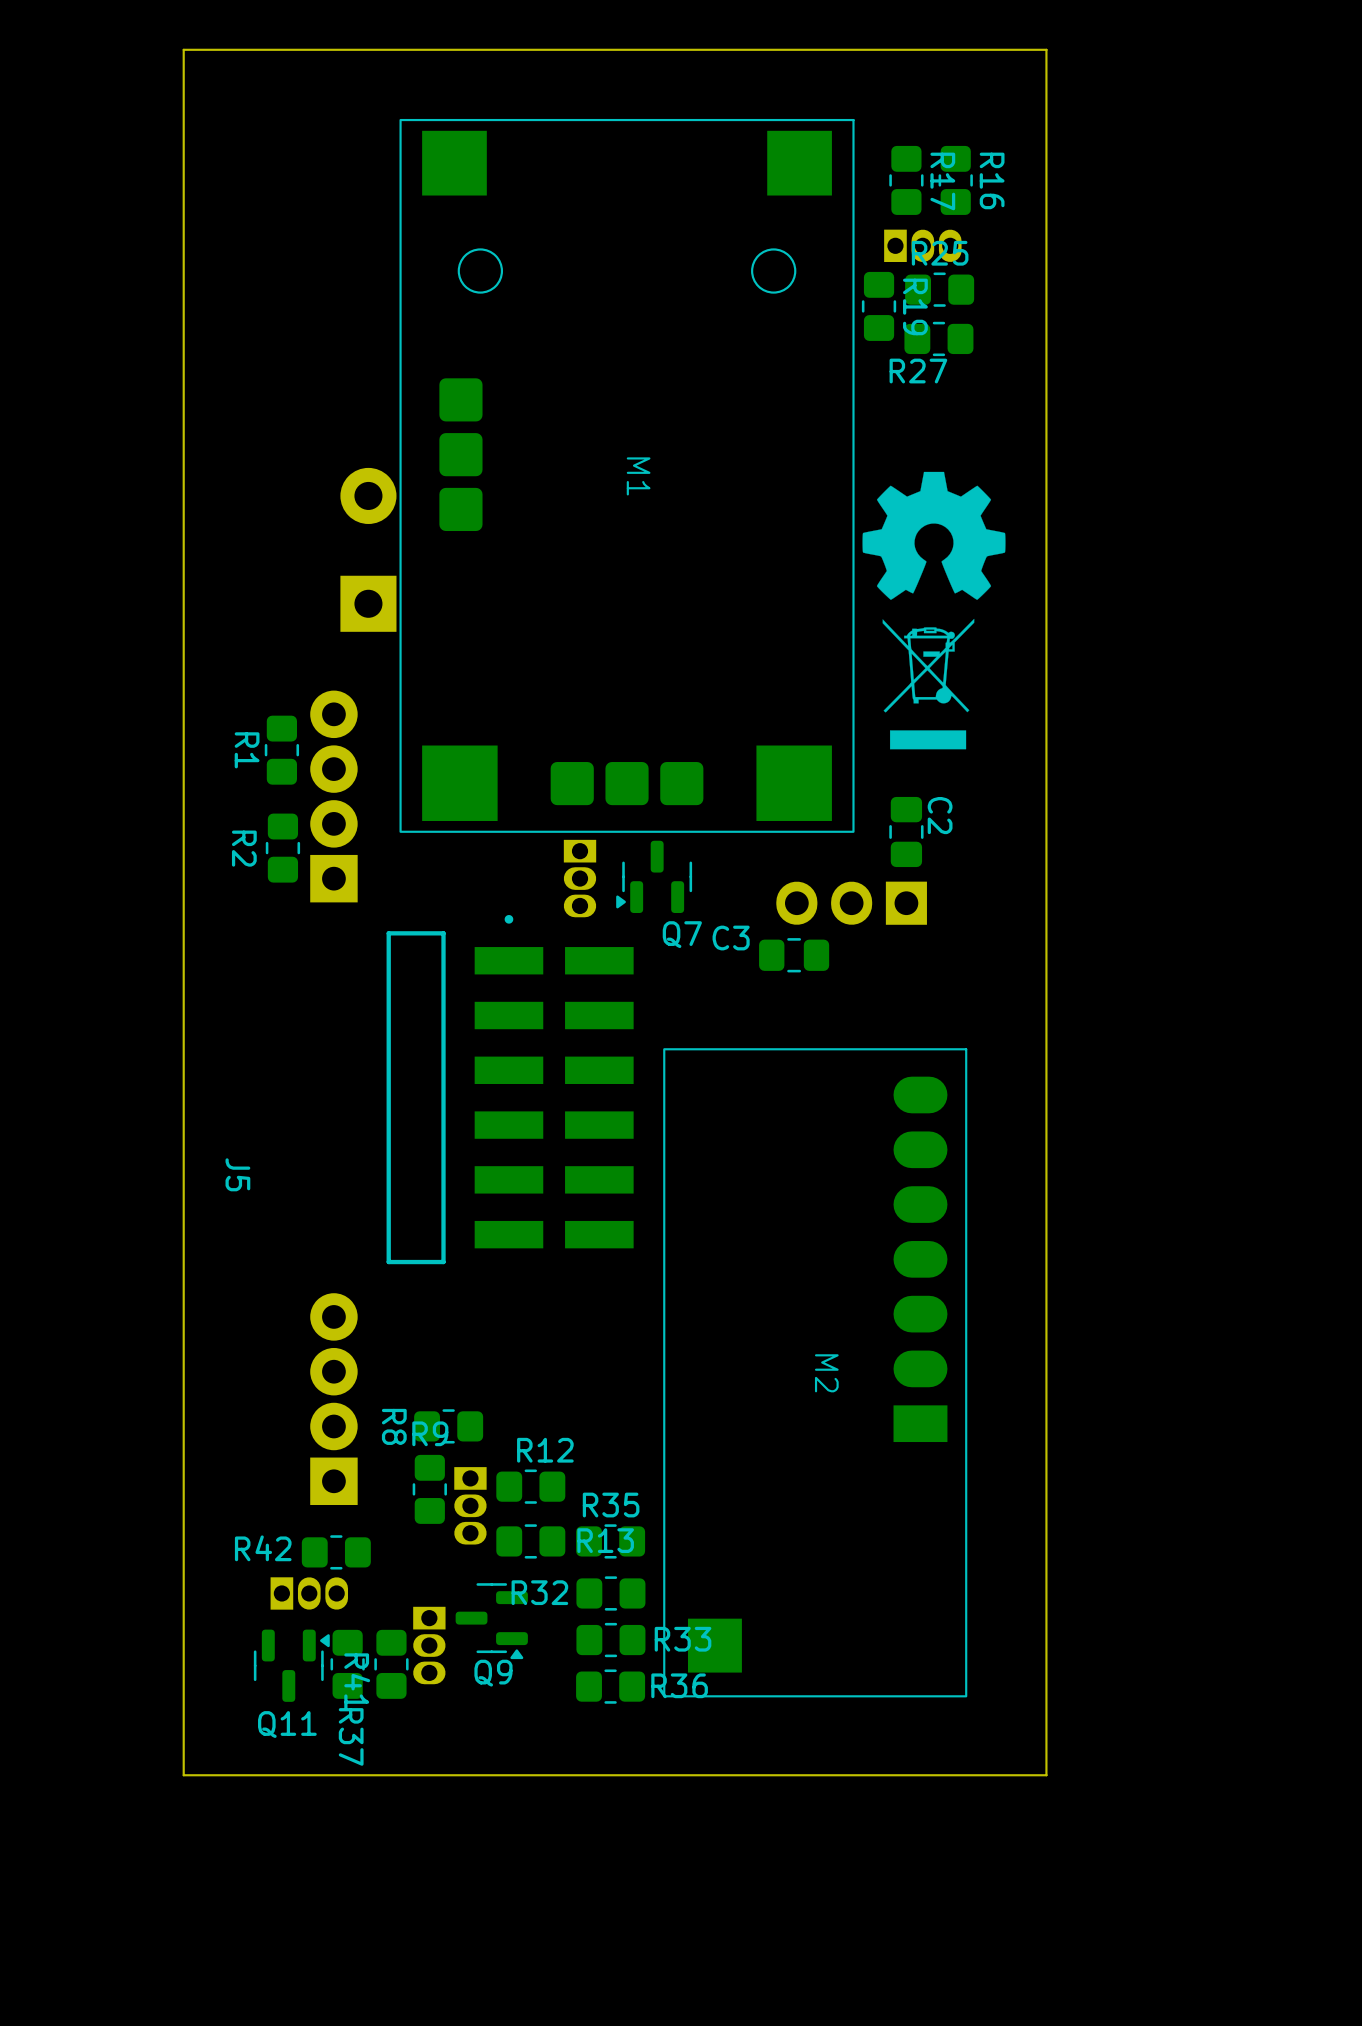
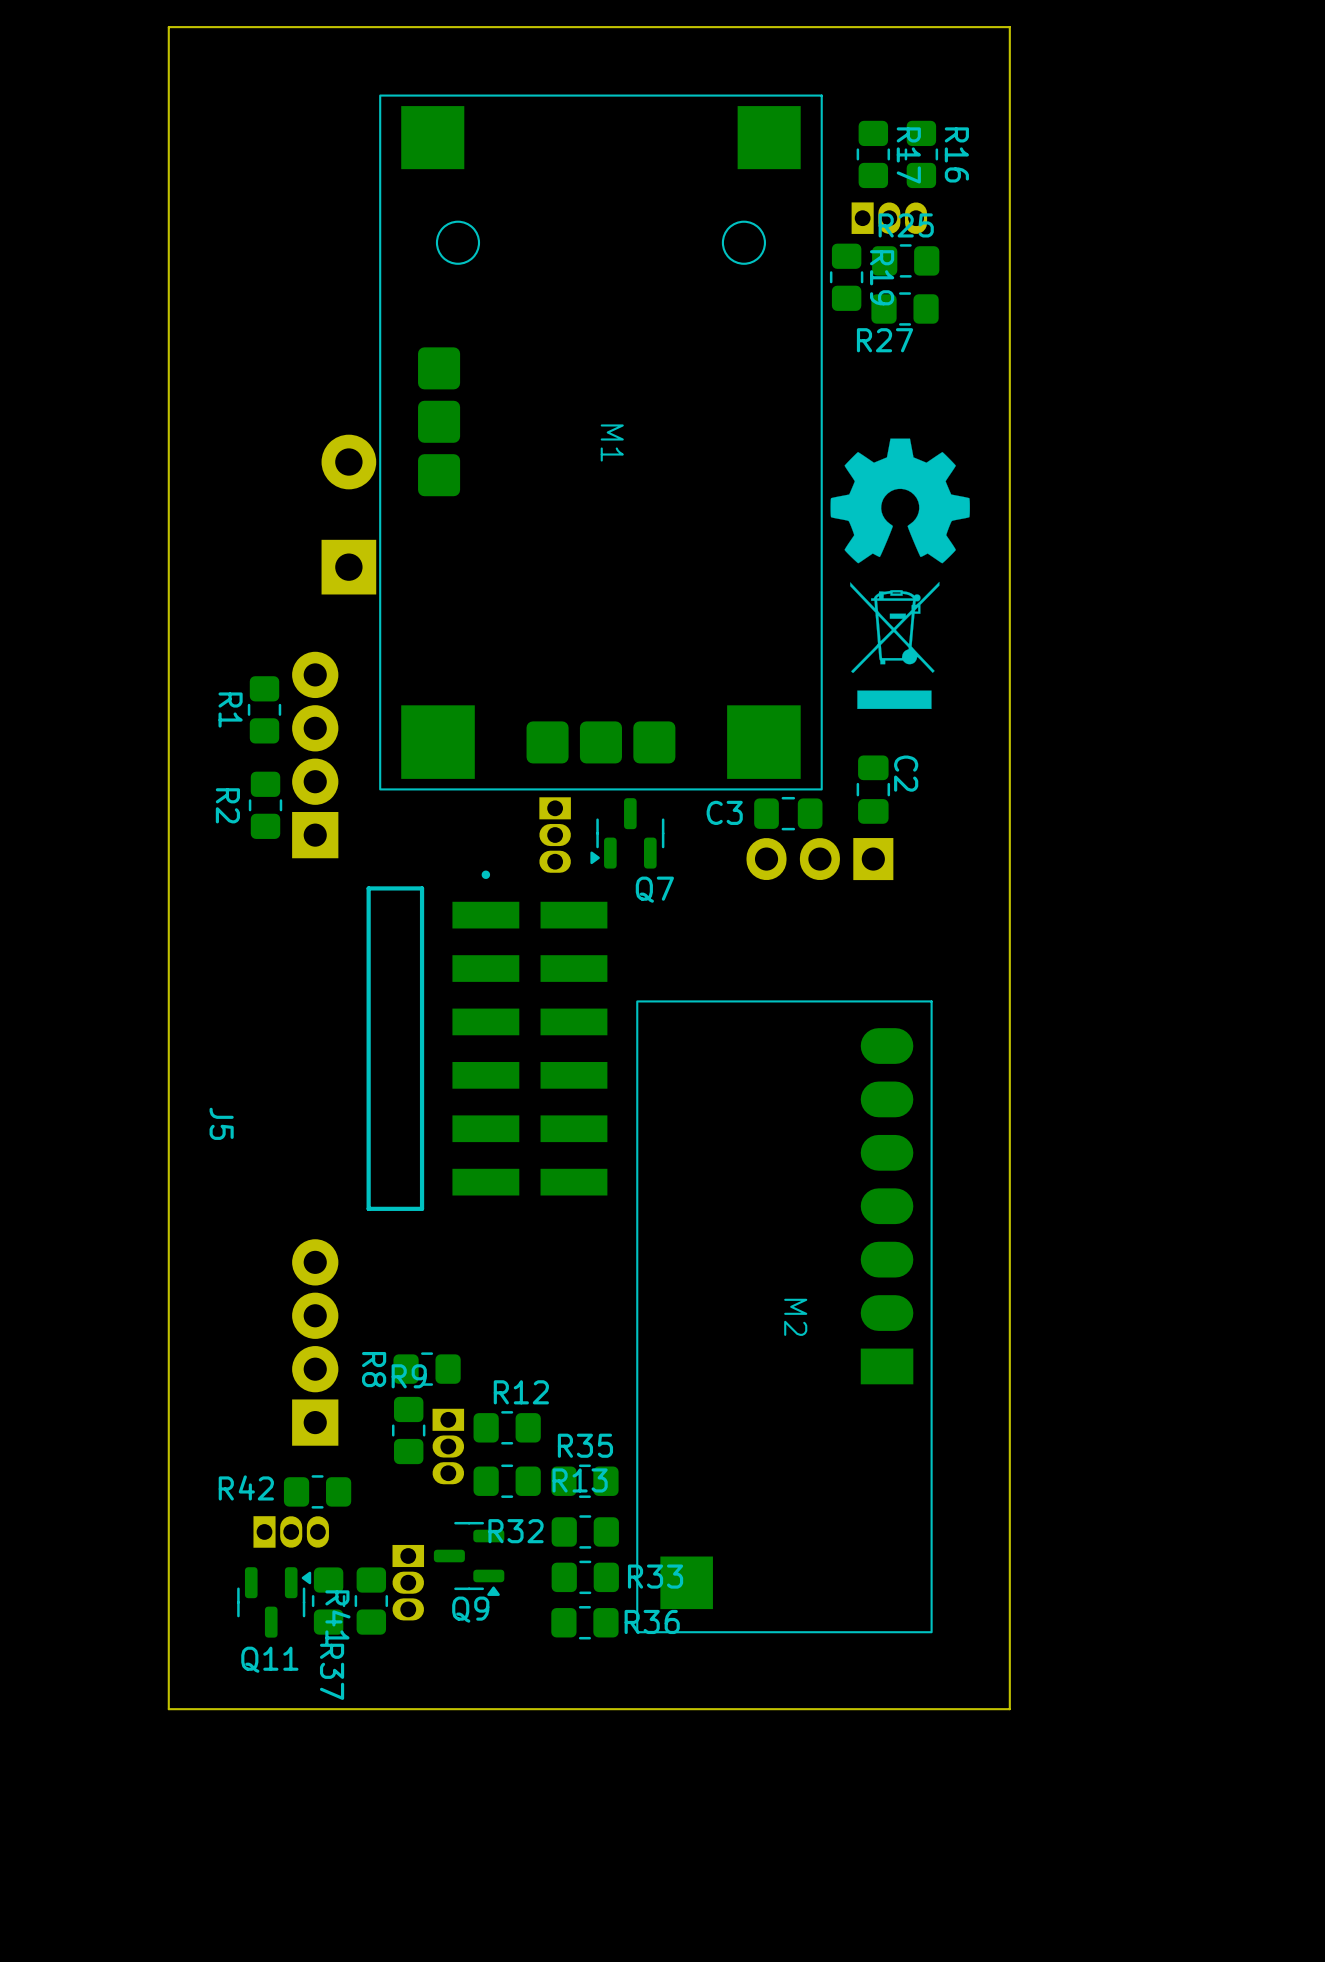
C3 name position: C3 (731, 938) -> C3 (724, 812)
C3 position: (794, 955) -> (788, 813)

